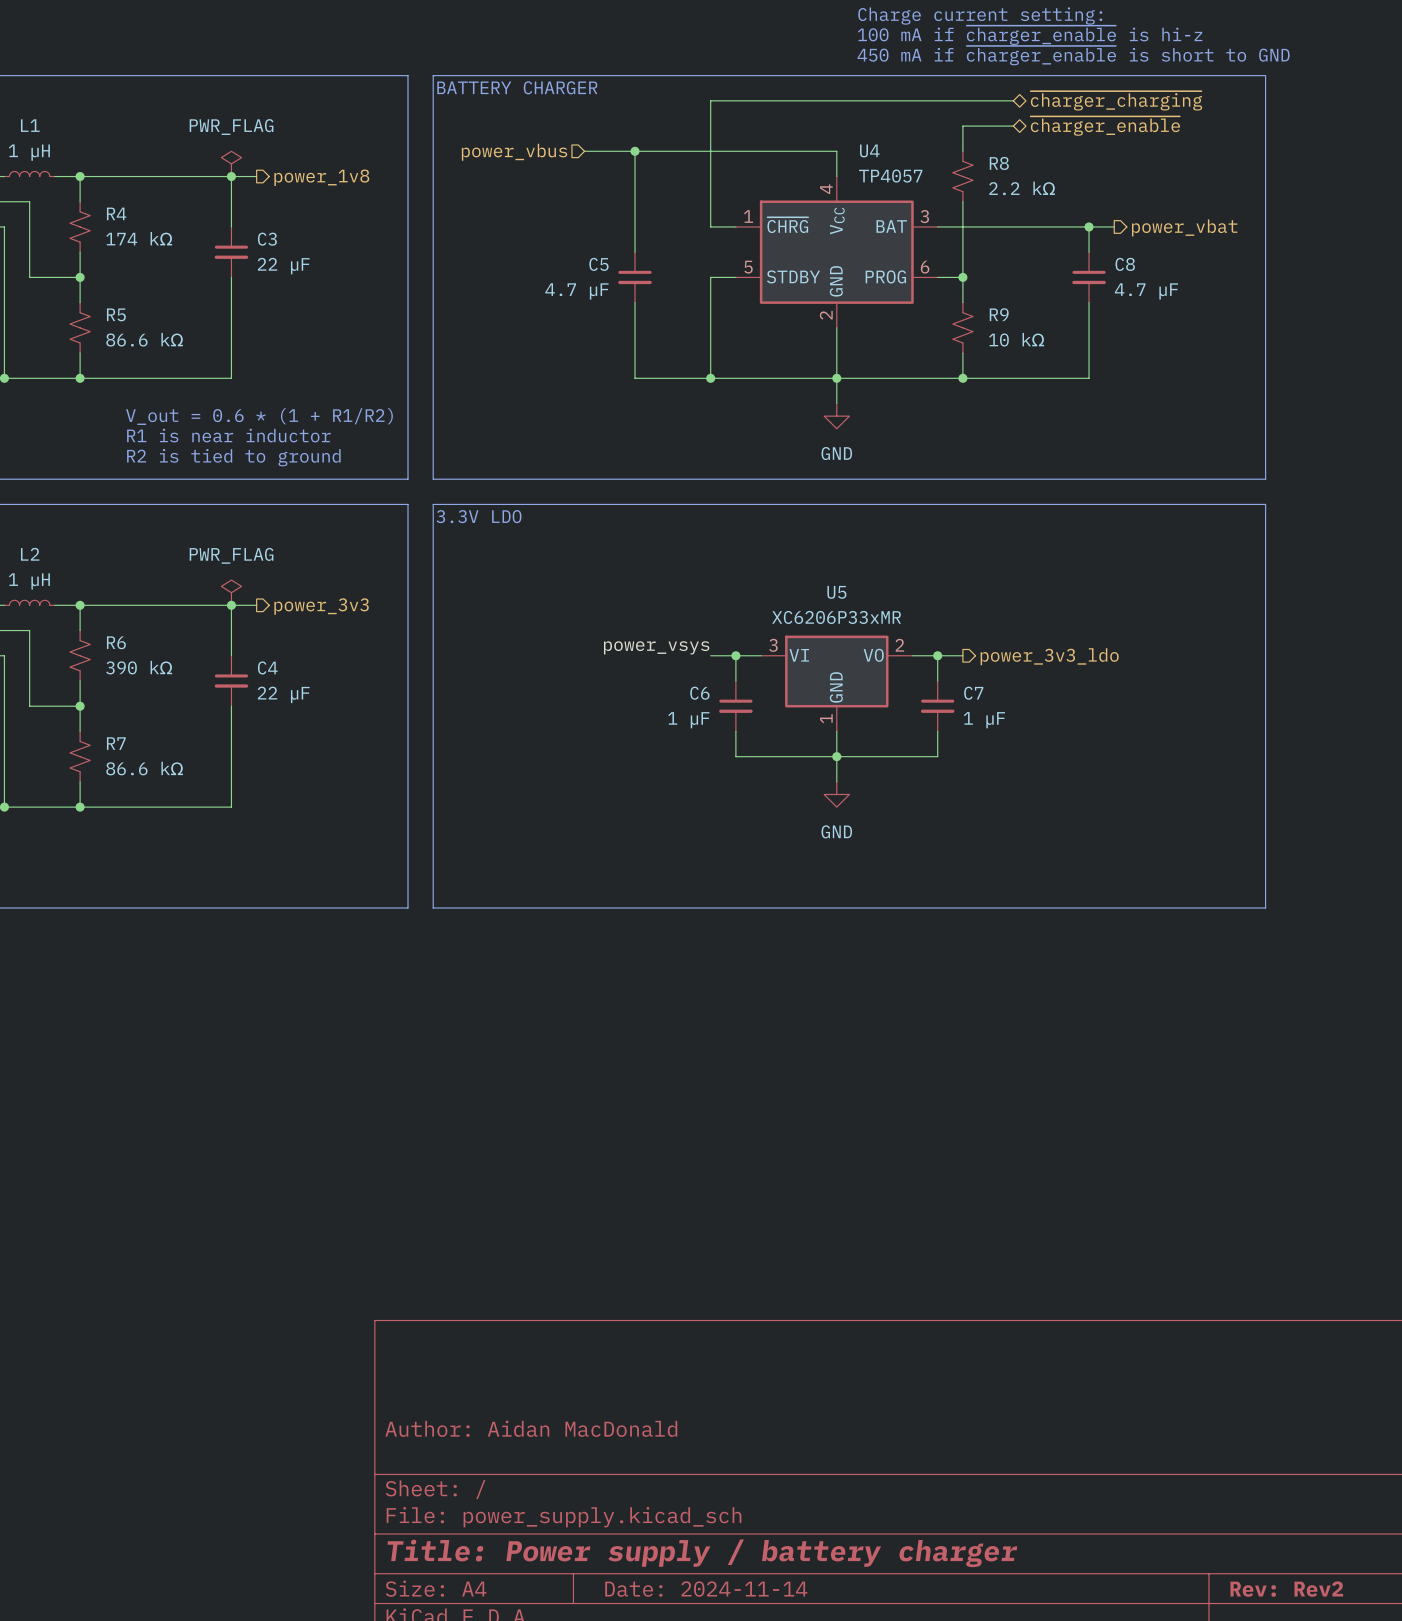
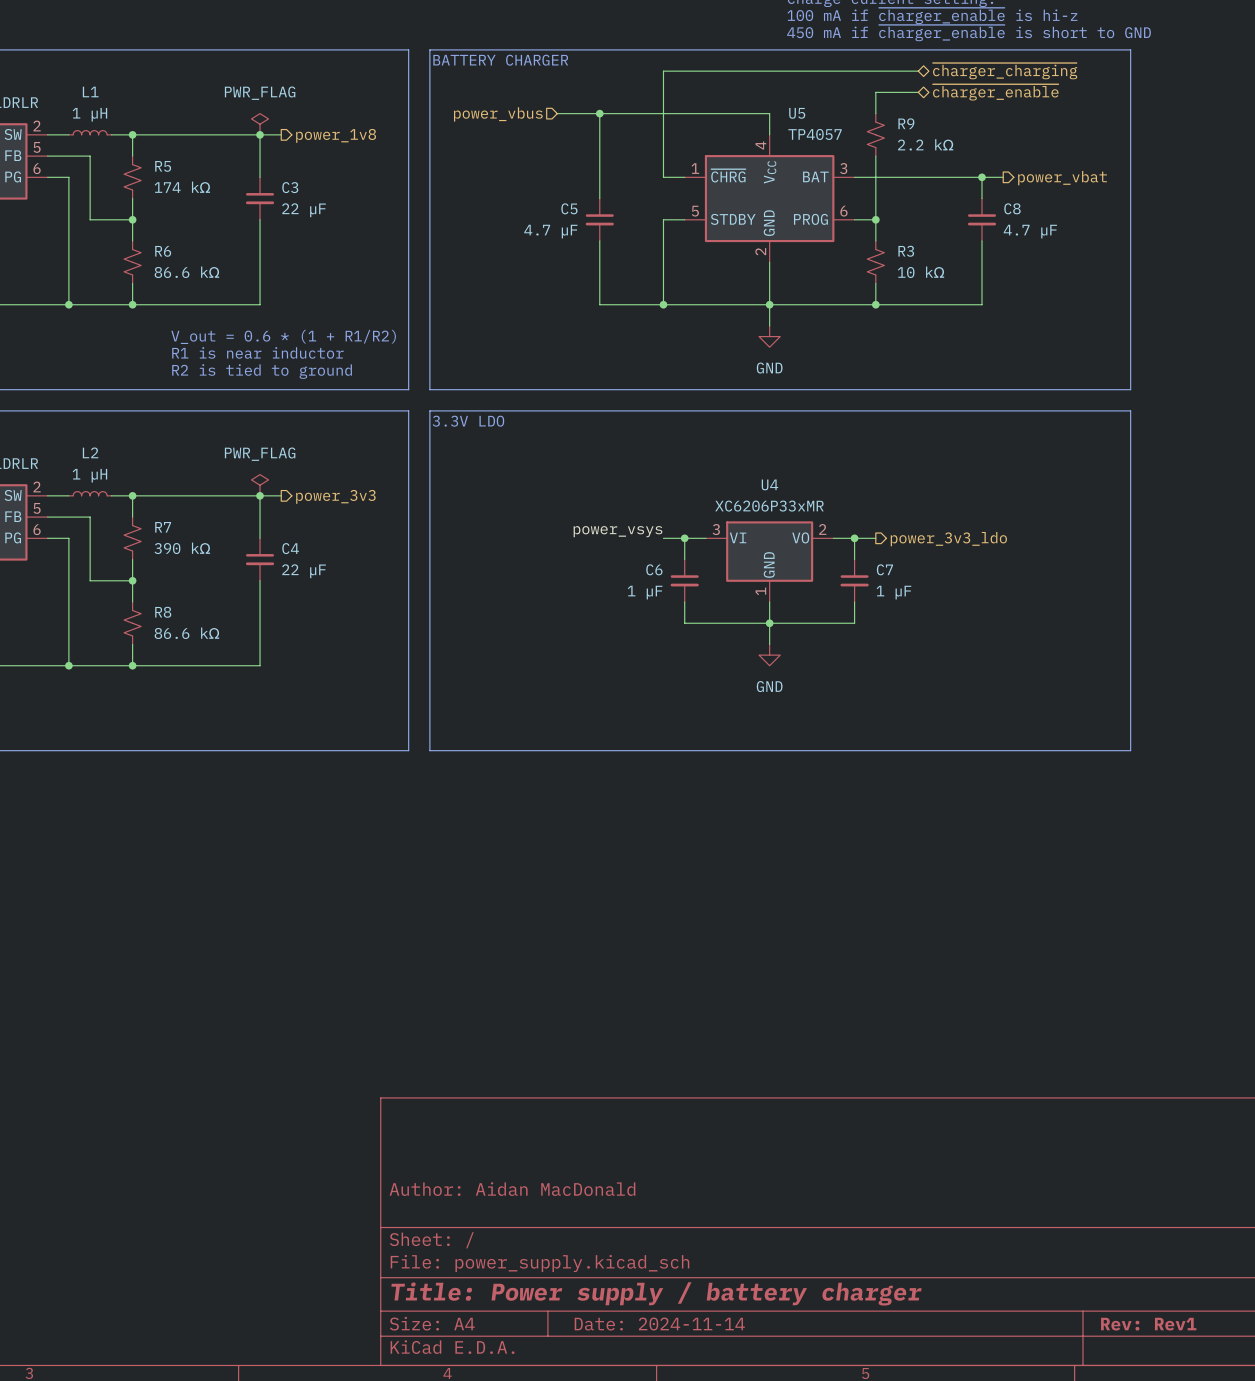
U4 name: U4 (869, 150) -> U5 (797, 113)
R8 name: R8 (999, 163) -> R9 (906, 123)
R4 name: R4 (116, 213) -> R5 (163, 166)
R5 name: R5 (116, 314) -> R6 (163, 251)
R9 name: R9 (999, 314) -> R3 (906, 251)
U5 name: U5 (836, 592) -> U4 (769, 484)
R6 name: R6 (116, 642) -> R7 (163, 527)
R7 name: R7 (116, 743) -> R8 (163, 612)
title block: Rev: Rev2 (1286, 1589) -> Rev: Rev1 (1148, 1324)

